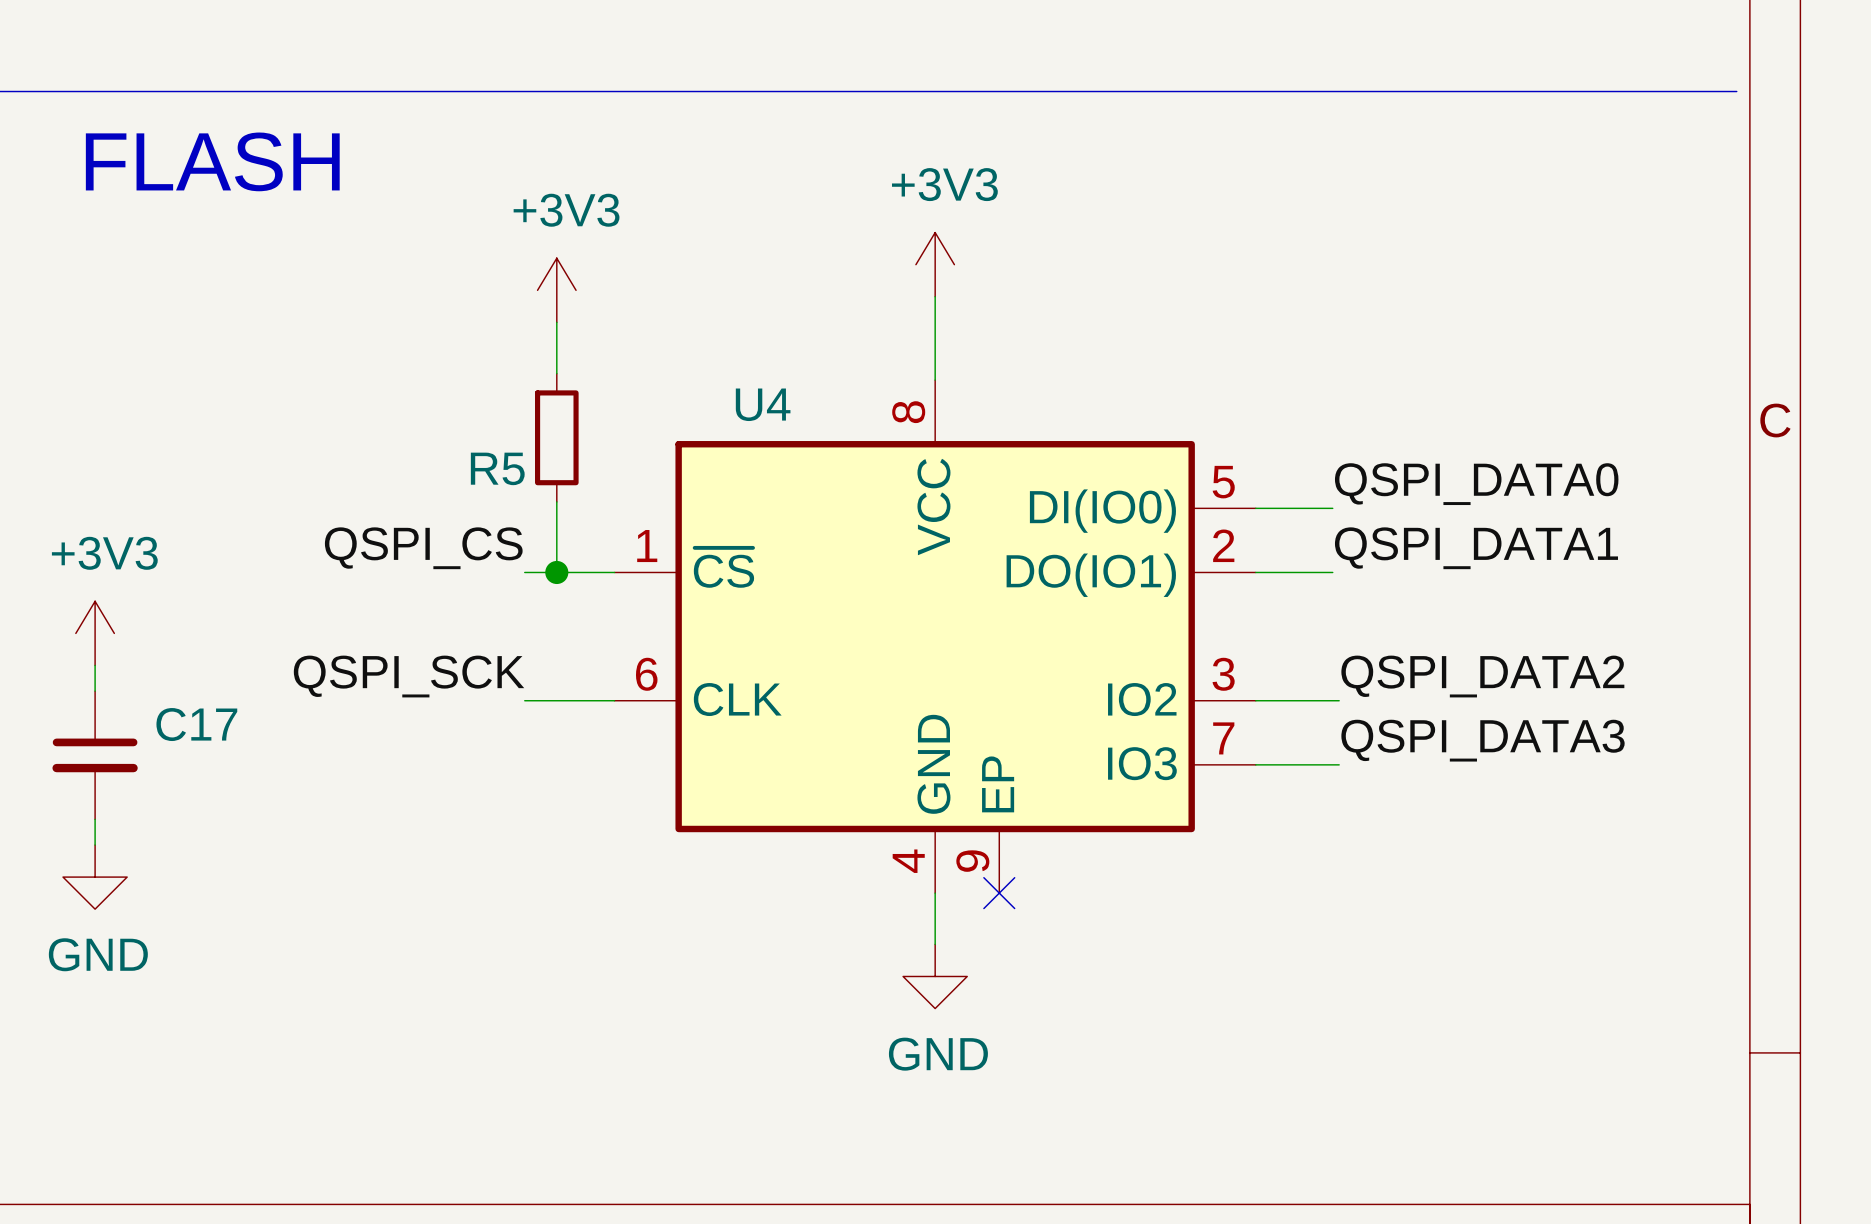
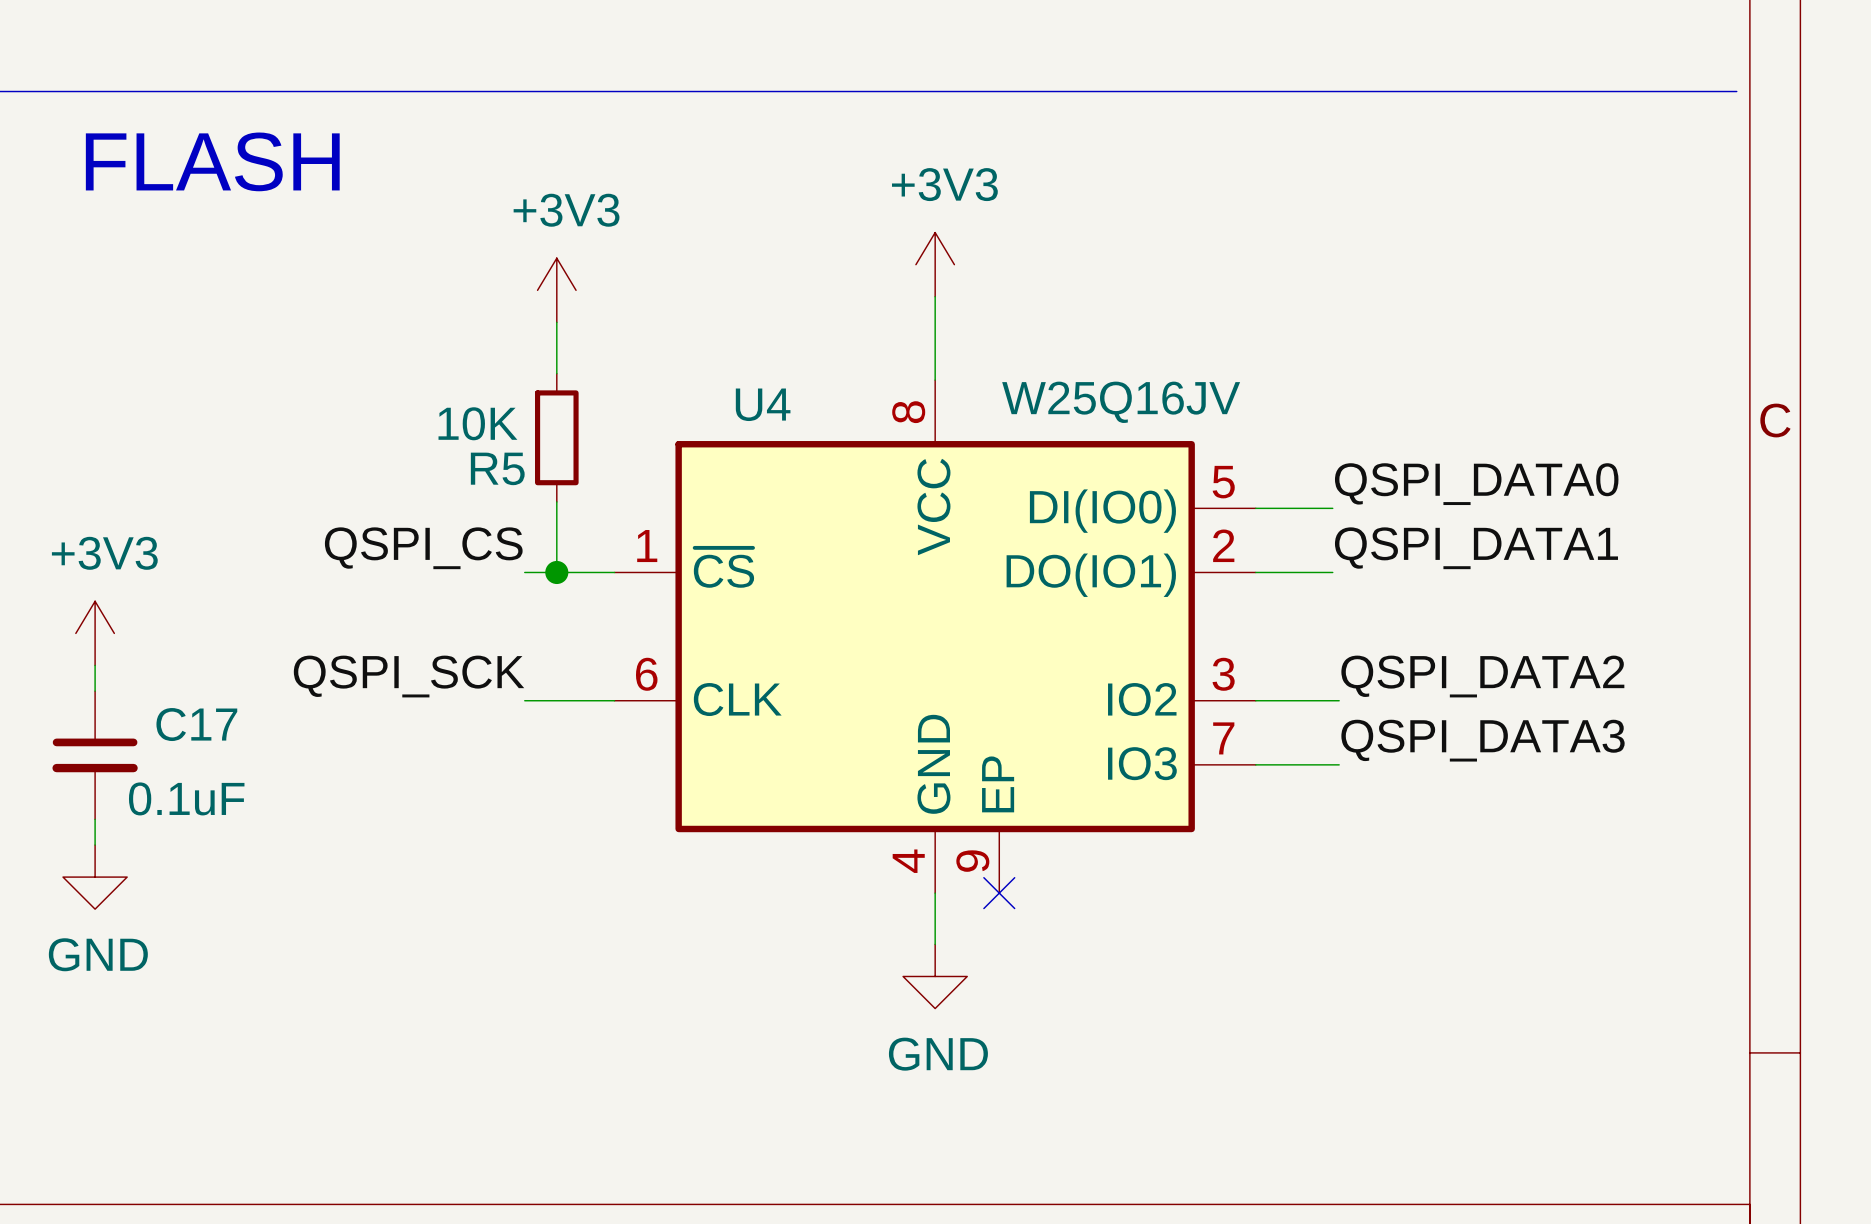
U4 value: none -> W25Q16JV (1121, 402)
R5 value: none -> 10K (477, 423)
C17 value: none -> 0.1uF (186, 798)

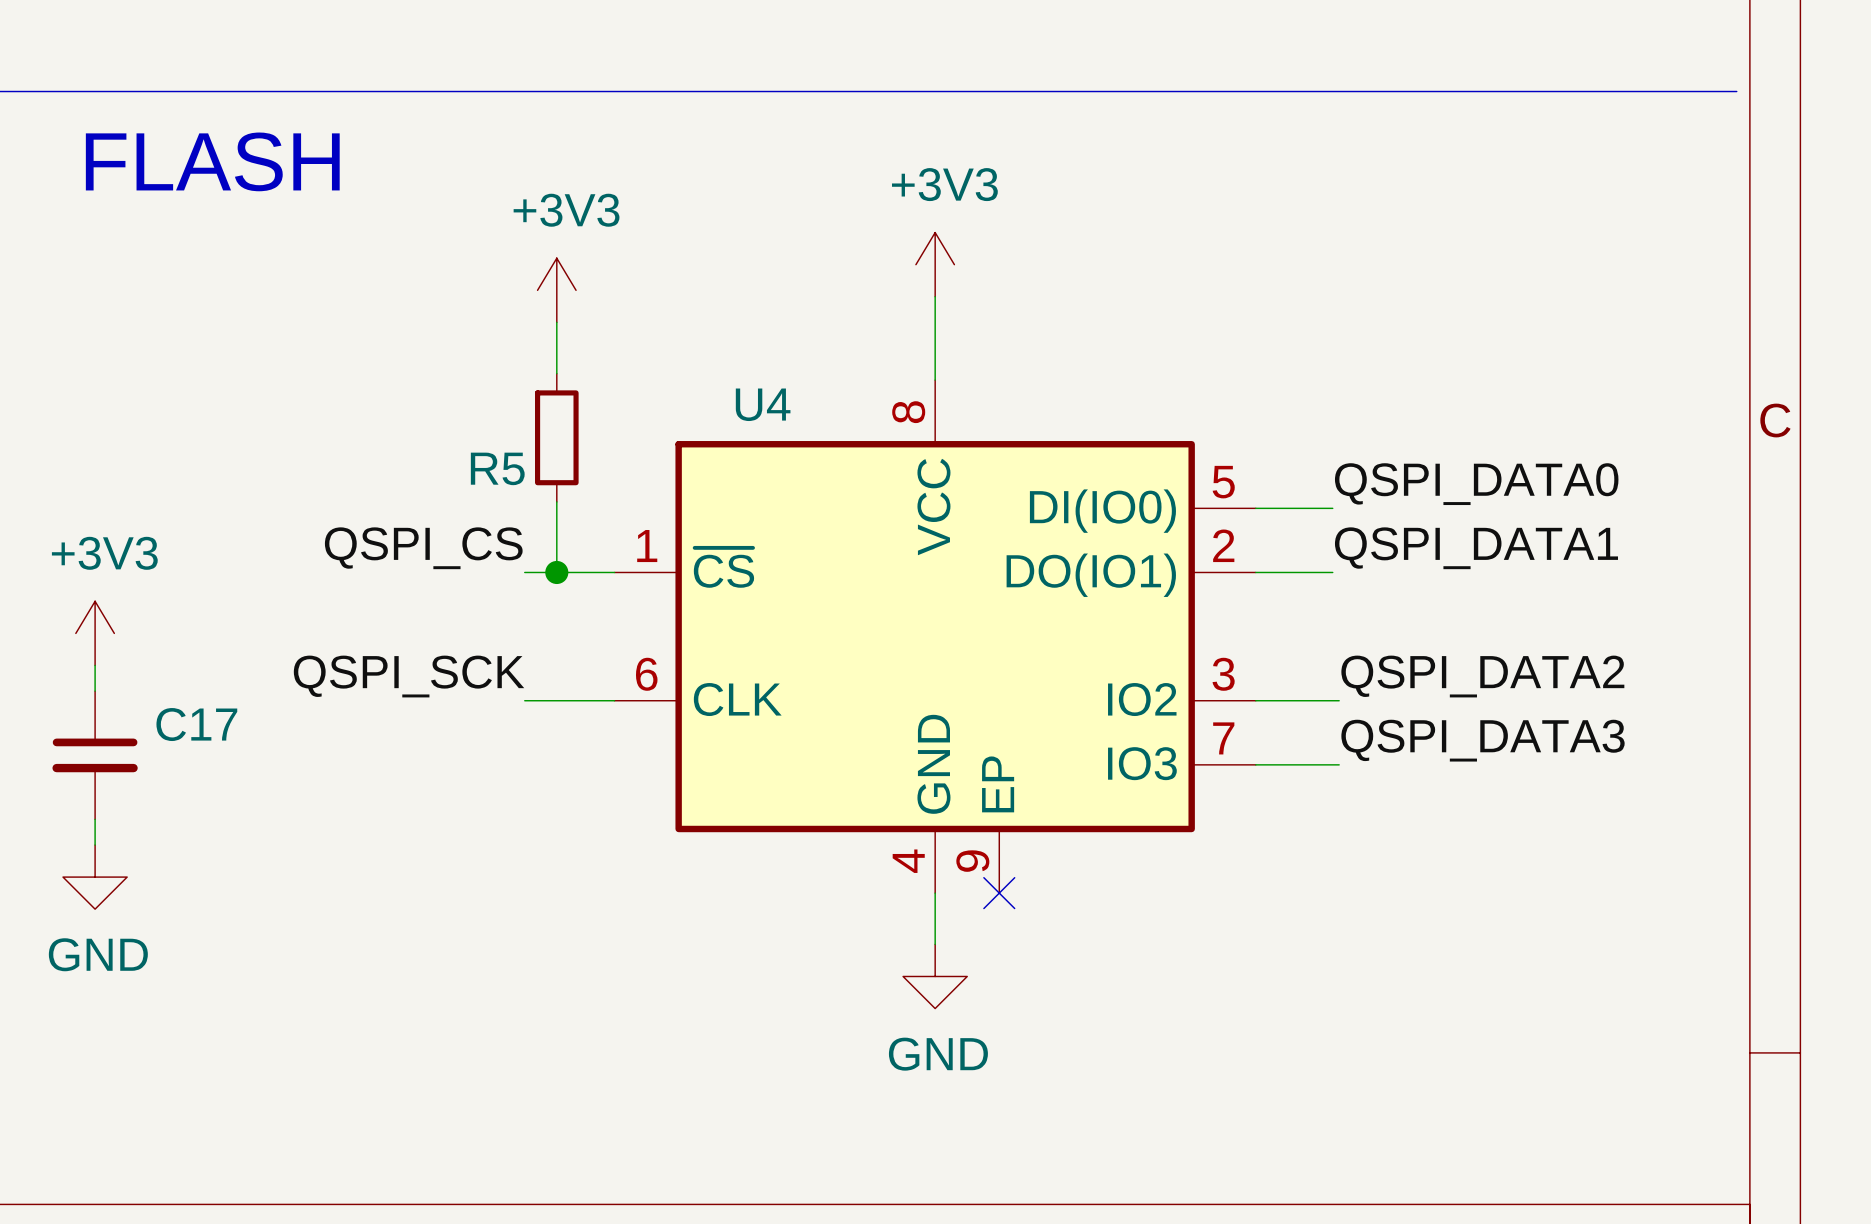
U4 value: W25Q16JV (1121, 402) -> none
R5 value: 10K (477, 423) -> none
C17 value: 0.1uF (186, 798) -> none

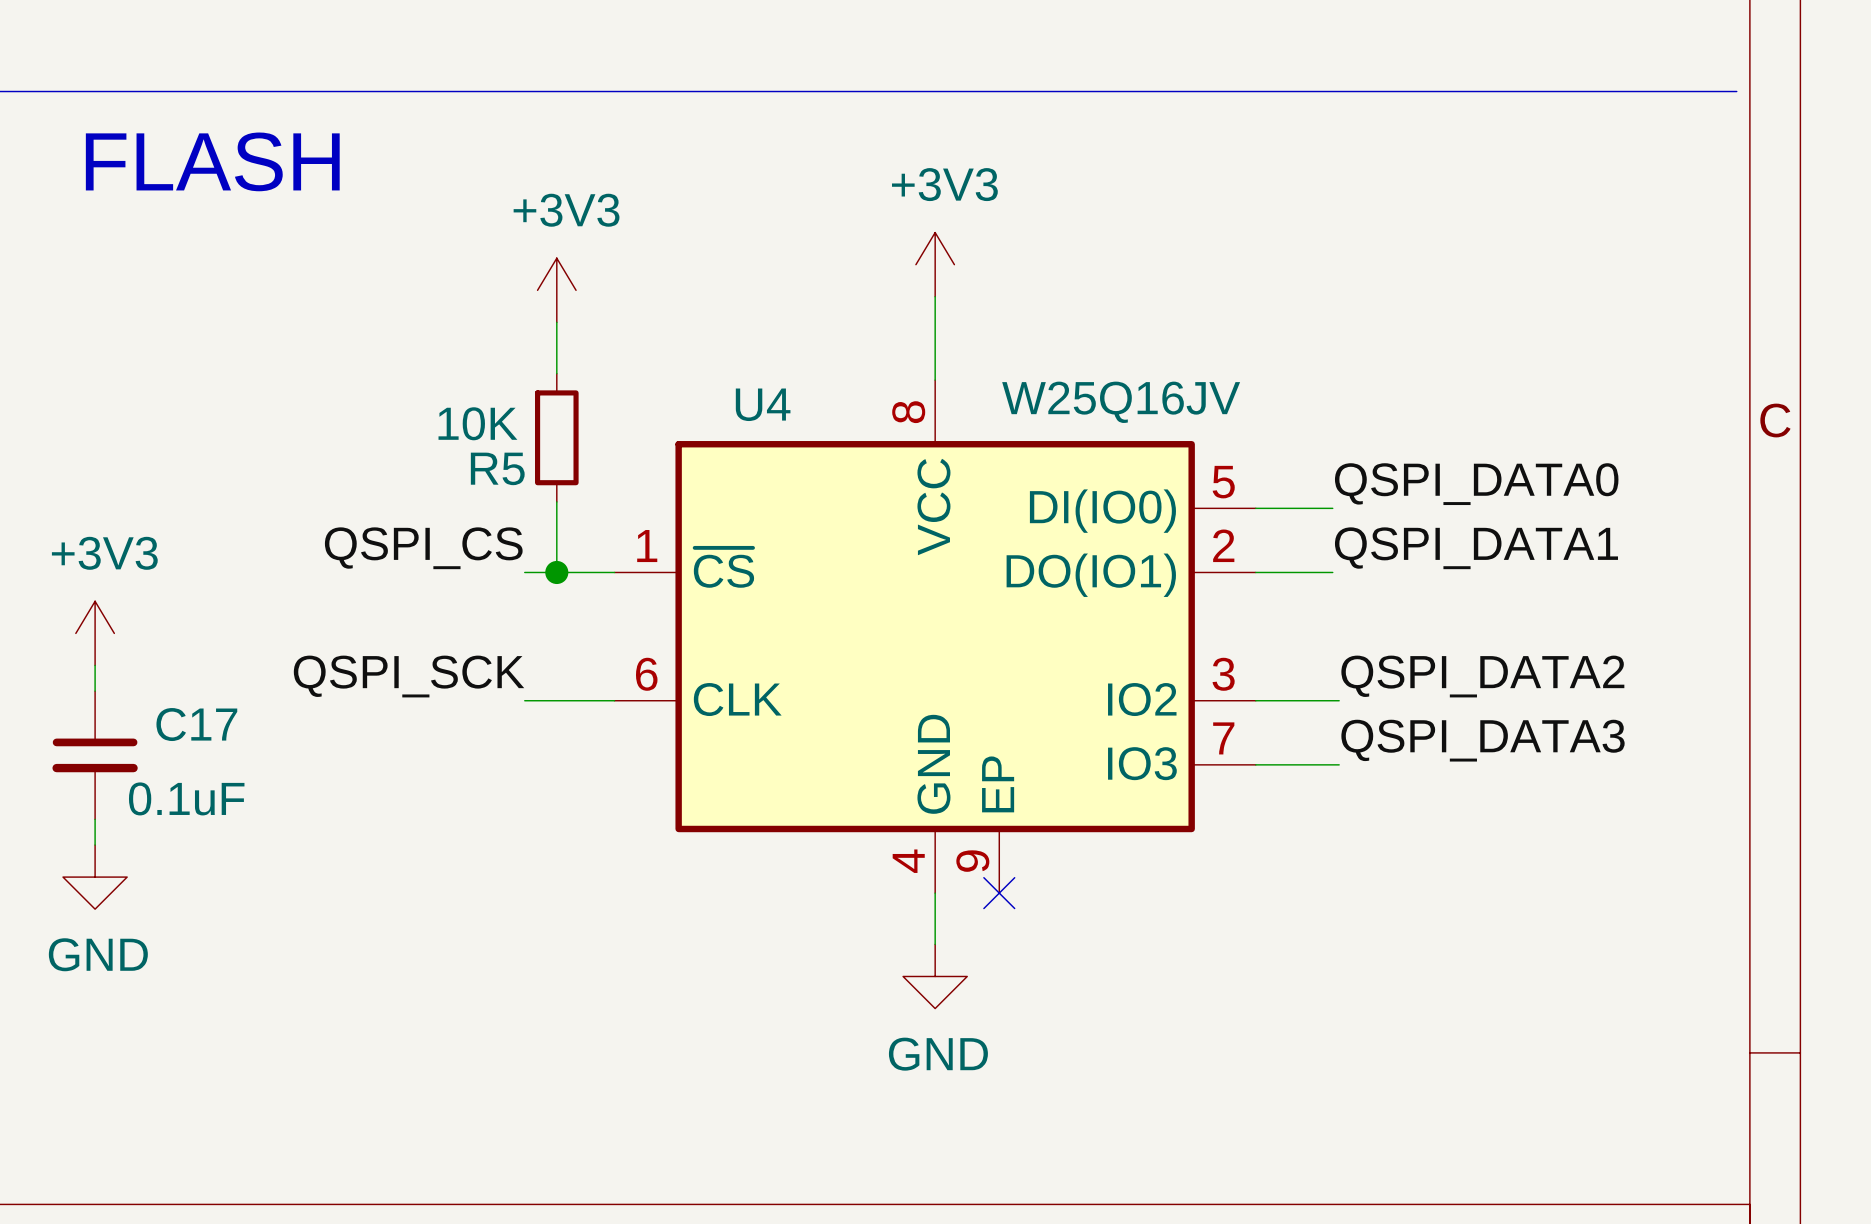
U4 value: none -> W25Q16JV (1121, 402)
R5 value: none -> 10K (477, 423)
C17 value: none -> 0.1uF (186, 798)

